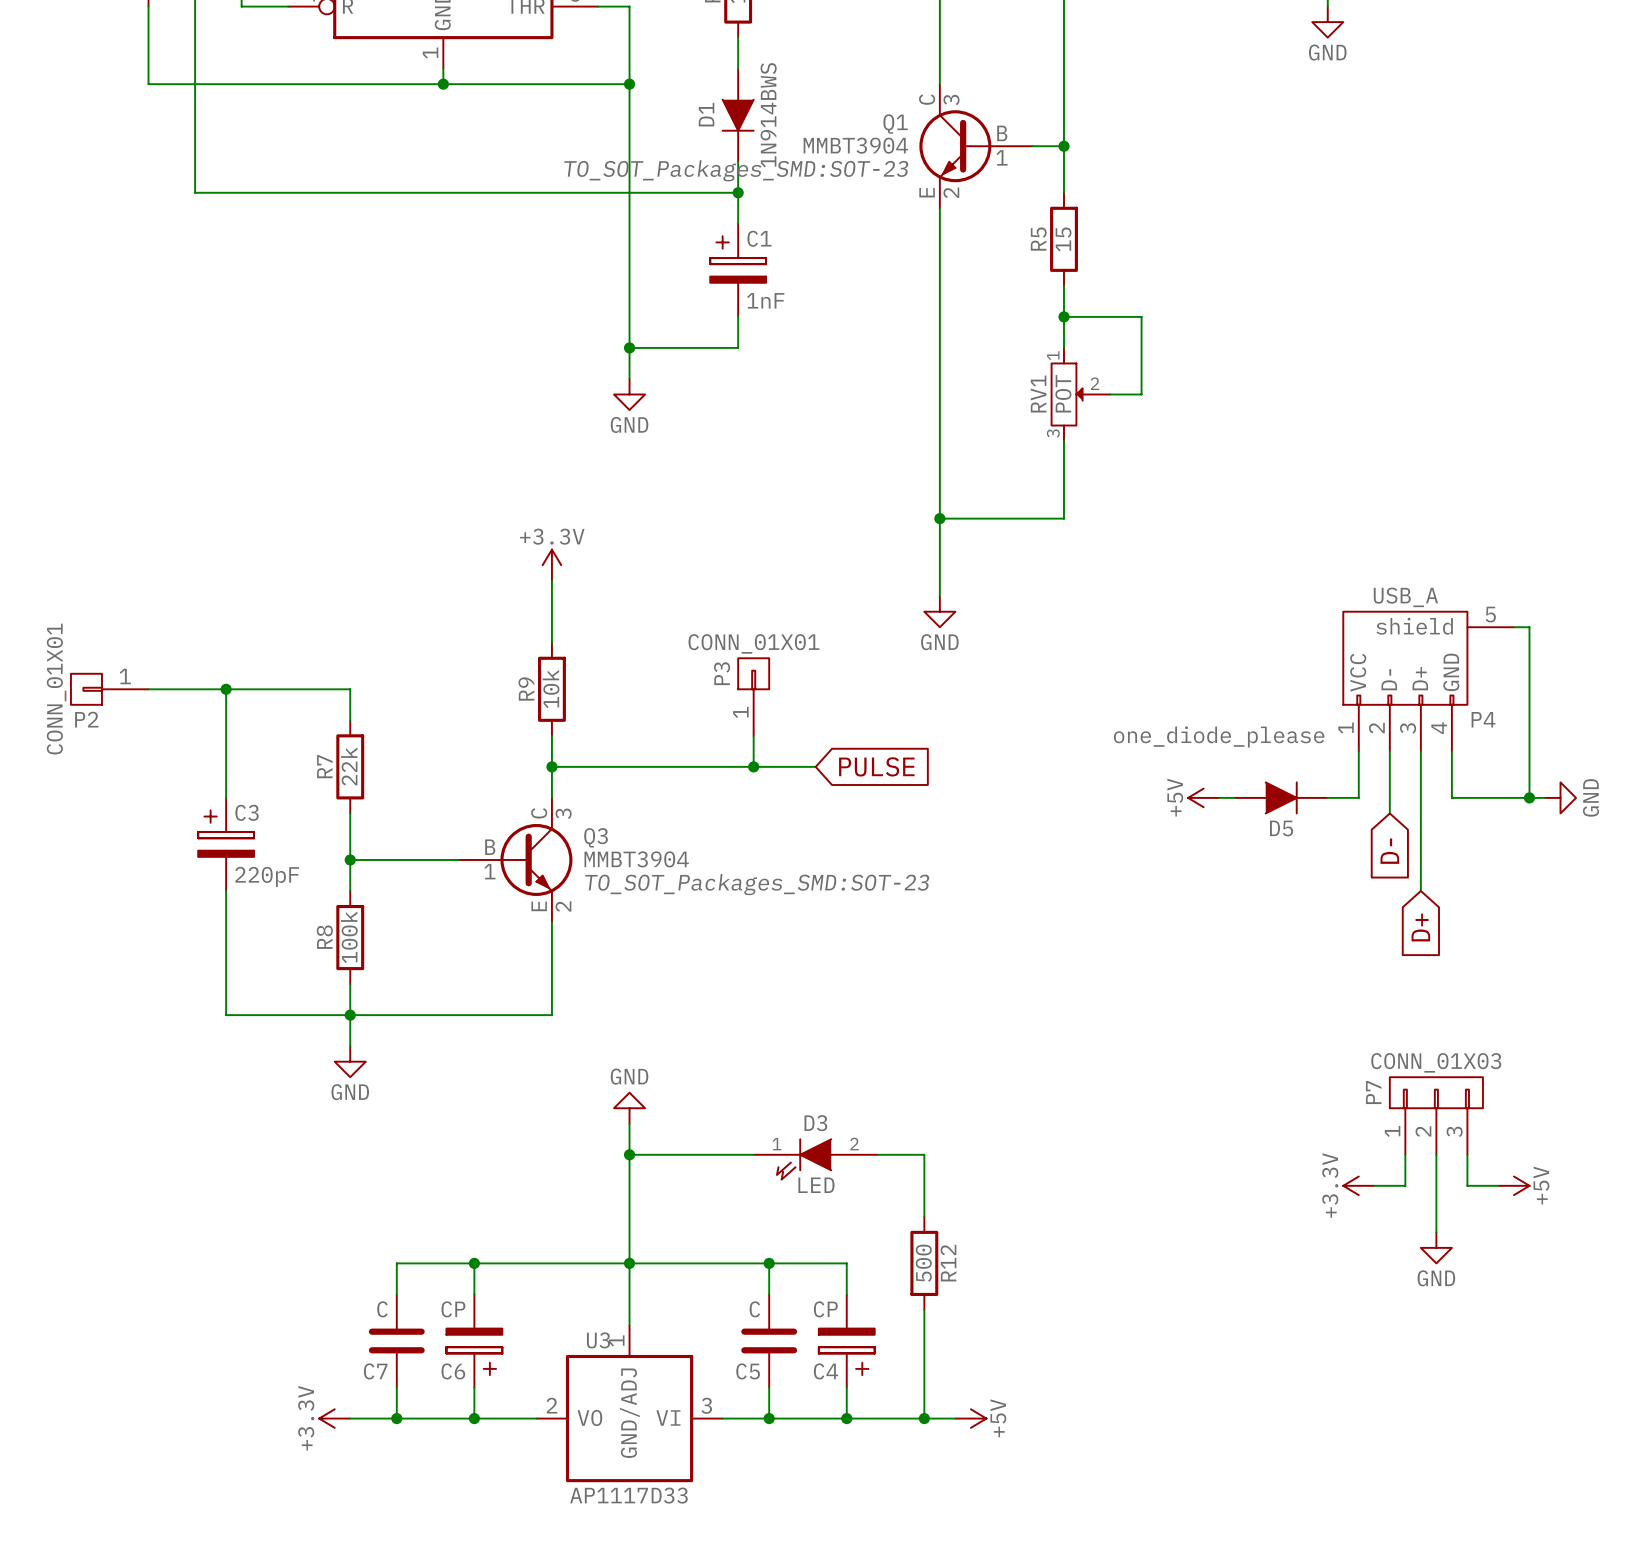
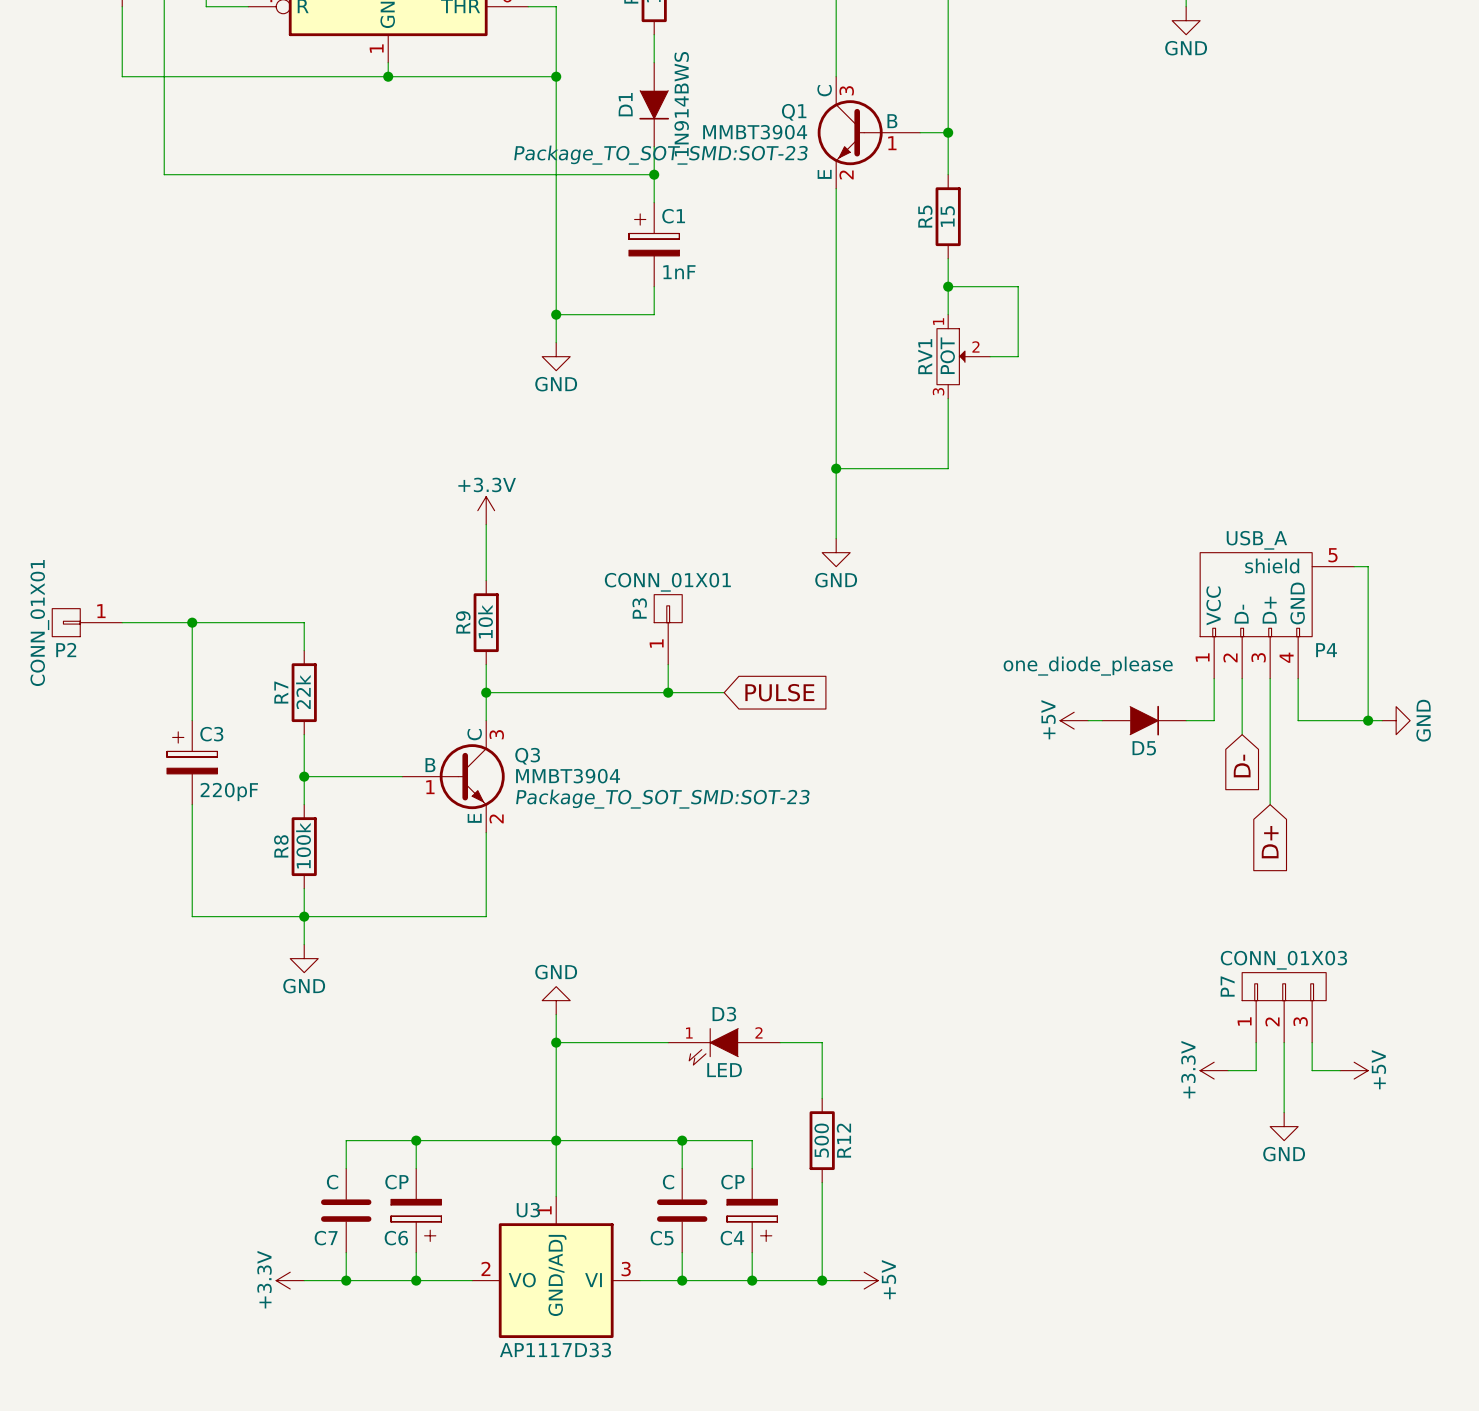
Q1 text: TO_SOT_Packages_SMD:SOT-23 (736, 170) -> Package_TO_SOT_SMD:SOT-23 (661, 155)
Q3 text: TO_SOT_Packages_SMD:SOT-23 (757, 884) -> Package_TO_SOT_SMD:SOT-23 (662, 799)

